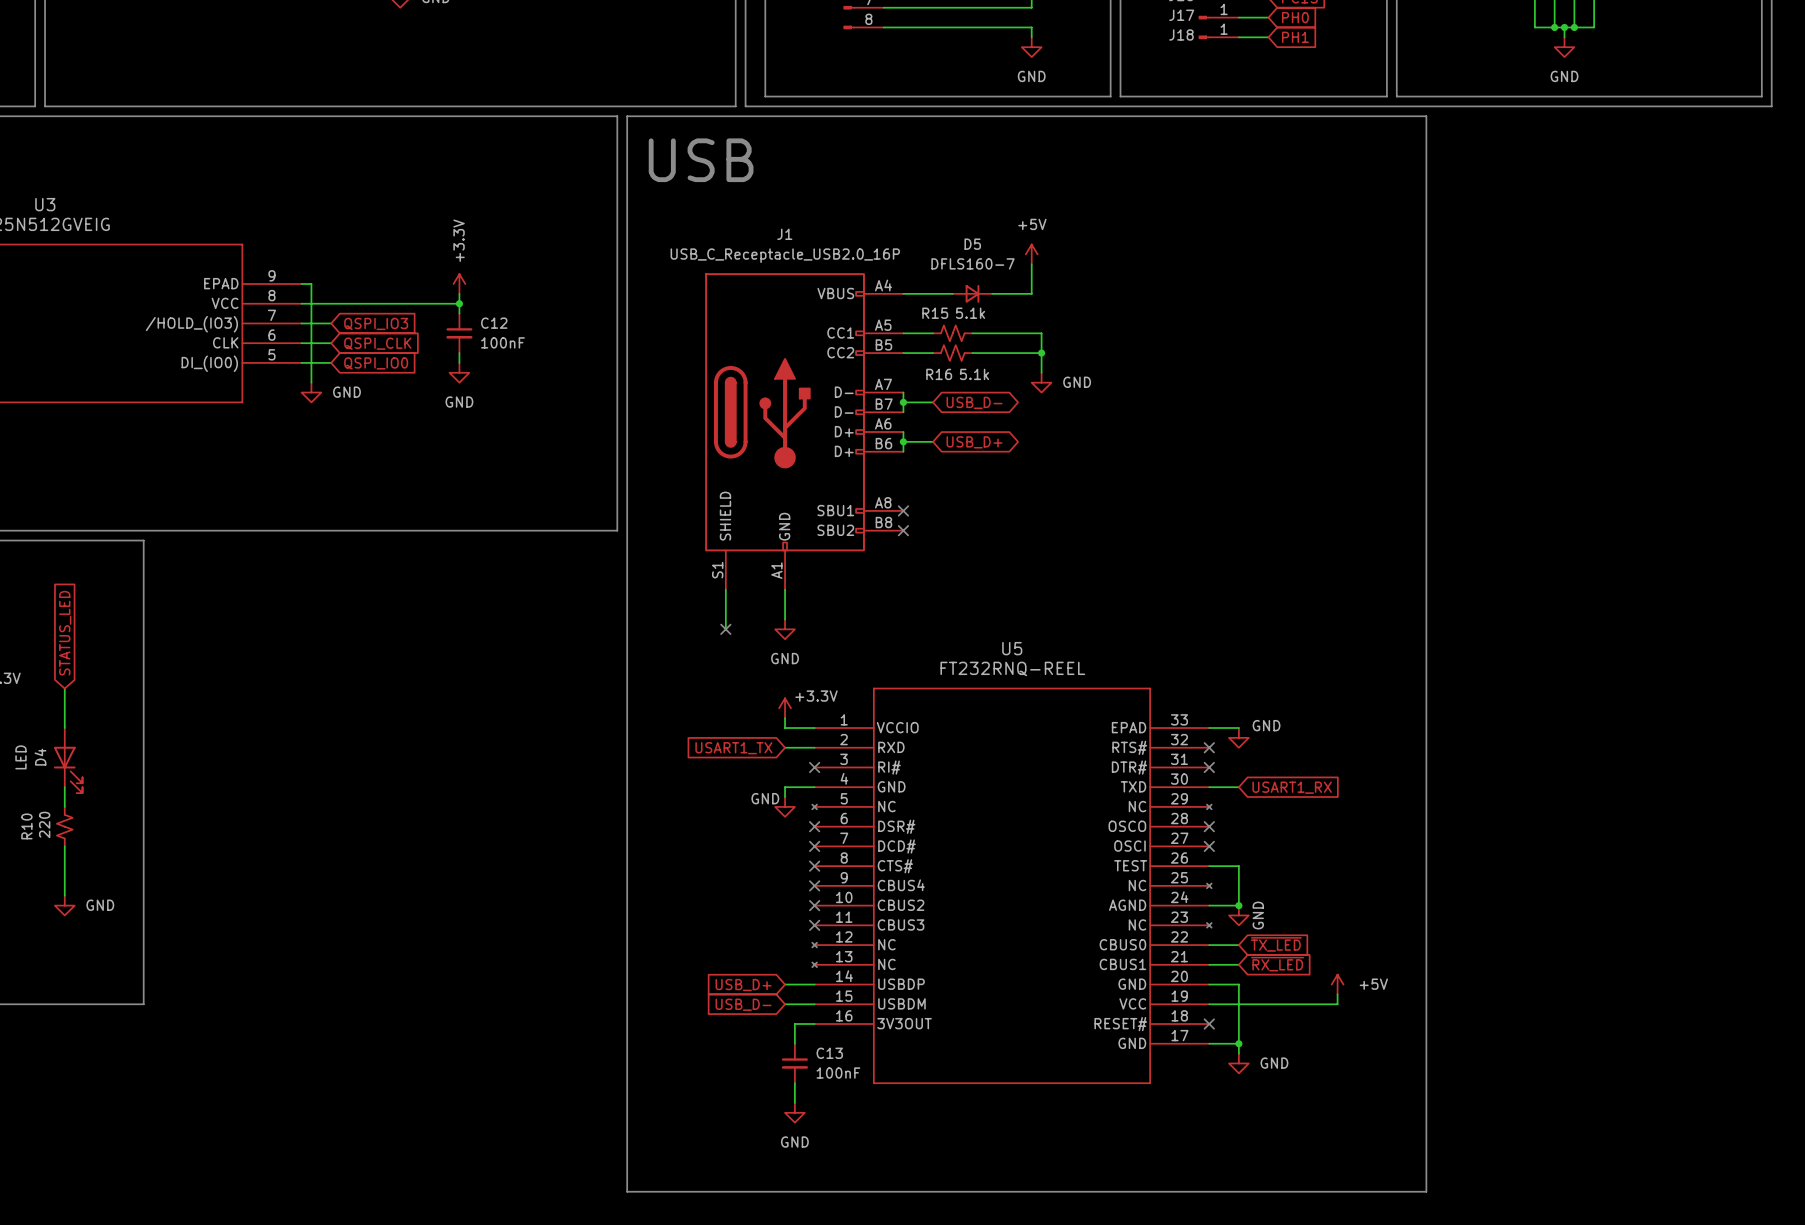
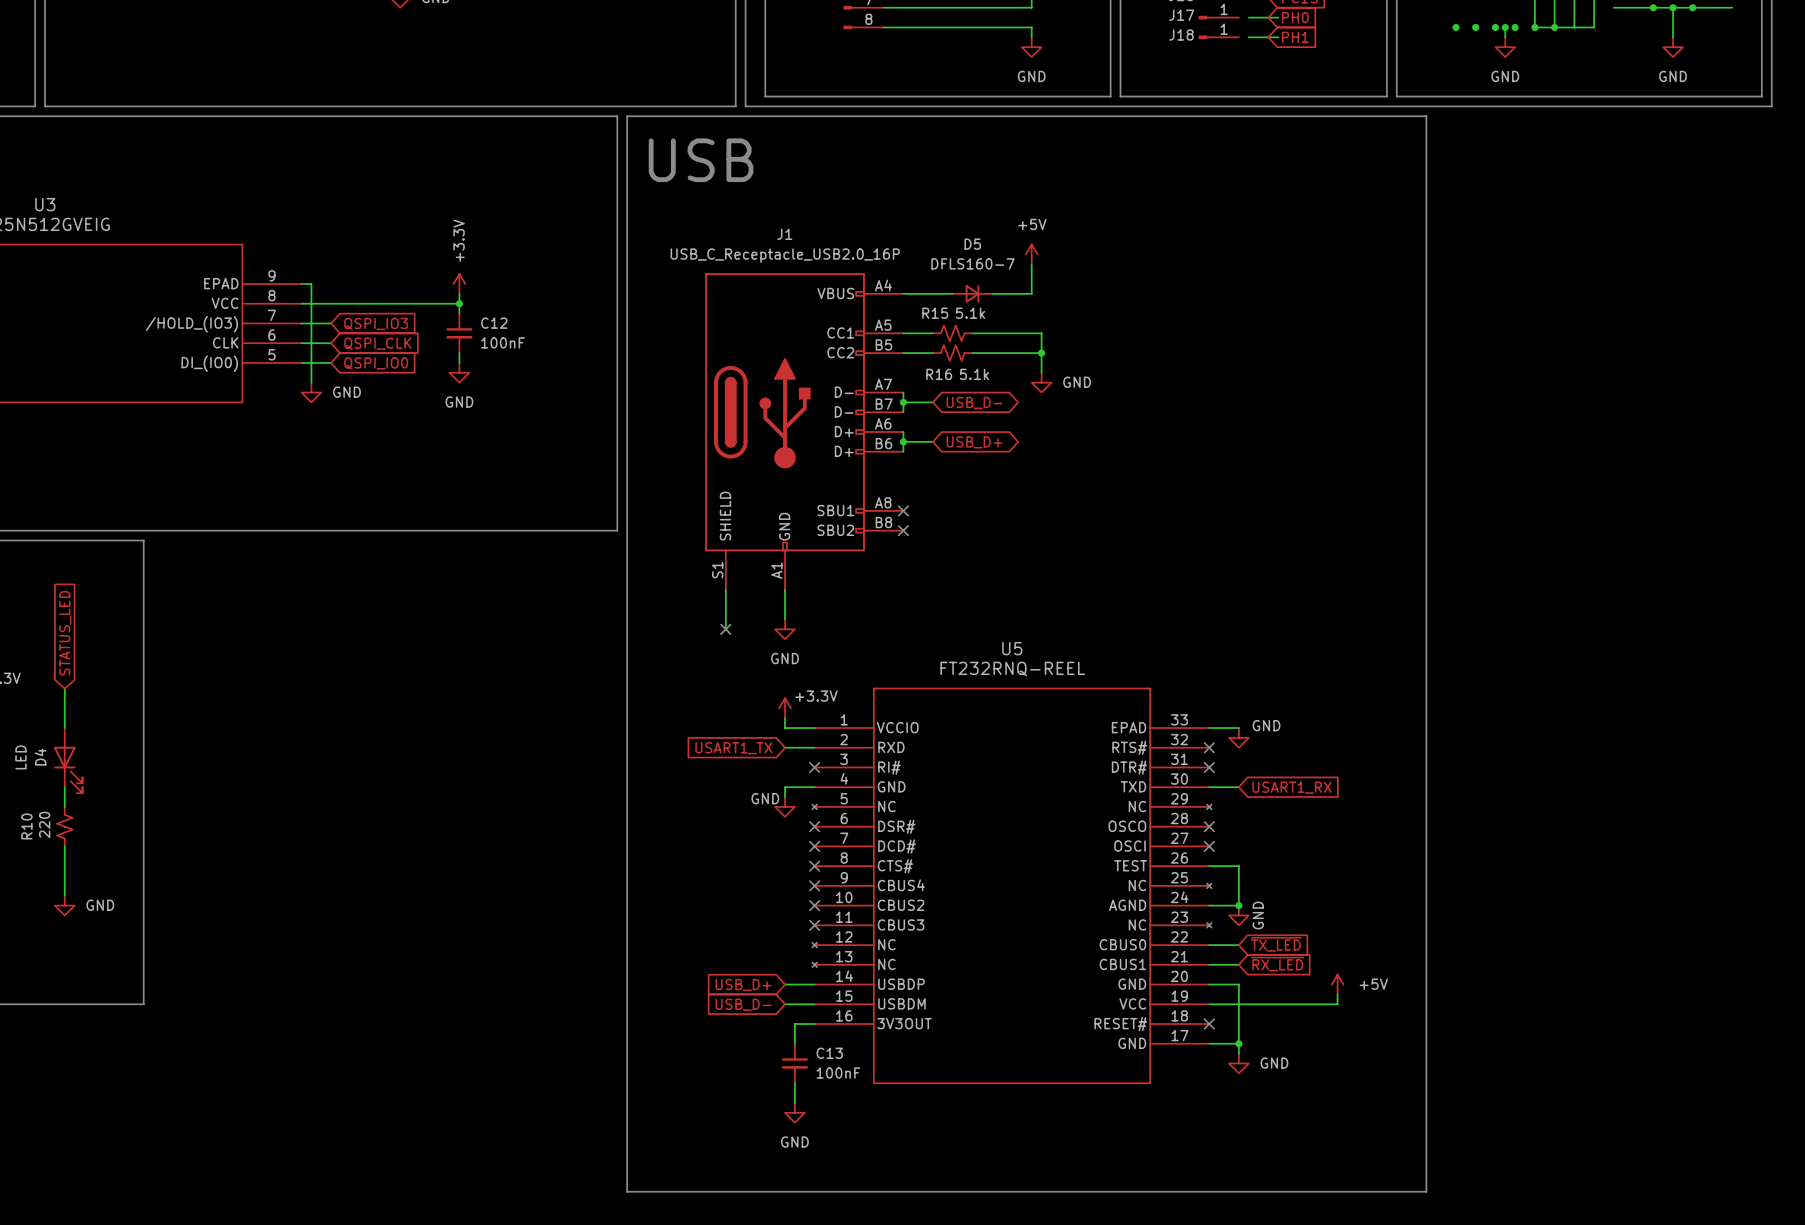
wire: none -> (1613, 7) (1732, 7)
junction: none -> (1653, 7)
wire: none -> (1673, 7) (1673, 37)
junction: none -> (1673, 7)
junction: none -> (1692, 7)
wire: (1238, 17) (1248, 17) -> (1268, 17) (1278, 17)
junction: none -> (1455, 27)
junction: none -> (1475, 27)
junction: none -> (1495, 27)
junction: none -> (1505, 27)
junction: none -> (1515, 27)
junction: none -> (1534, 27)
wire: (1564, 27) (1564, 37) -> (1505, 27) (1505, 37)
junction: (1564, 27) -> none
junction: (1574, 27) -> none
wire: (1238, 37) (1248, 37) -> (1268, 37) (1278, 37)
power symbol: none -> GND (1505, 47)
power symbol: GND (1564, 47) -> none
power symbol: none -> GND (1673, 47)

